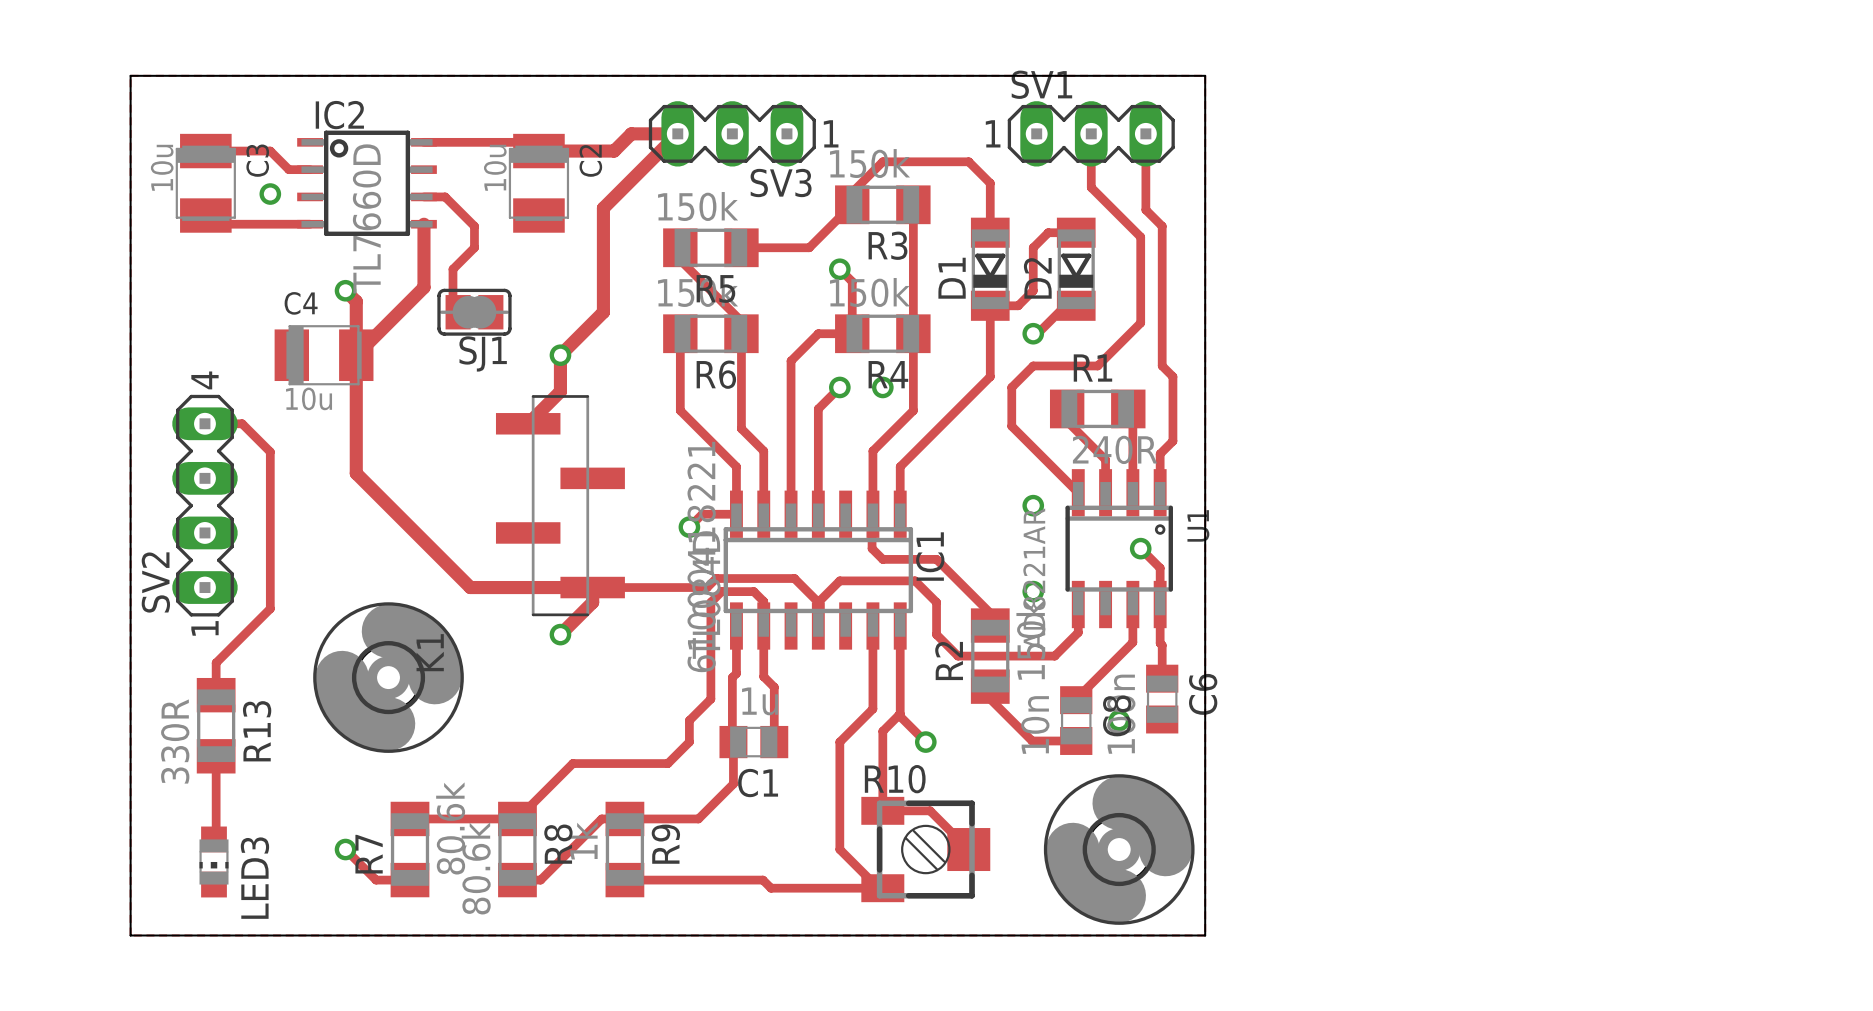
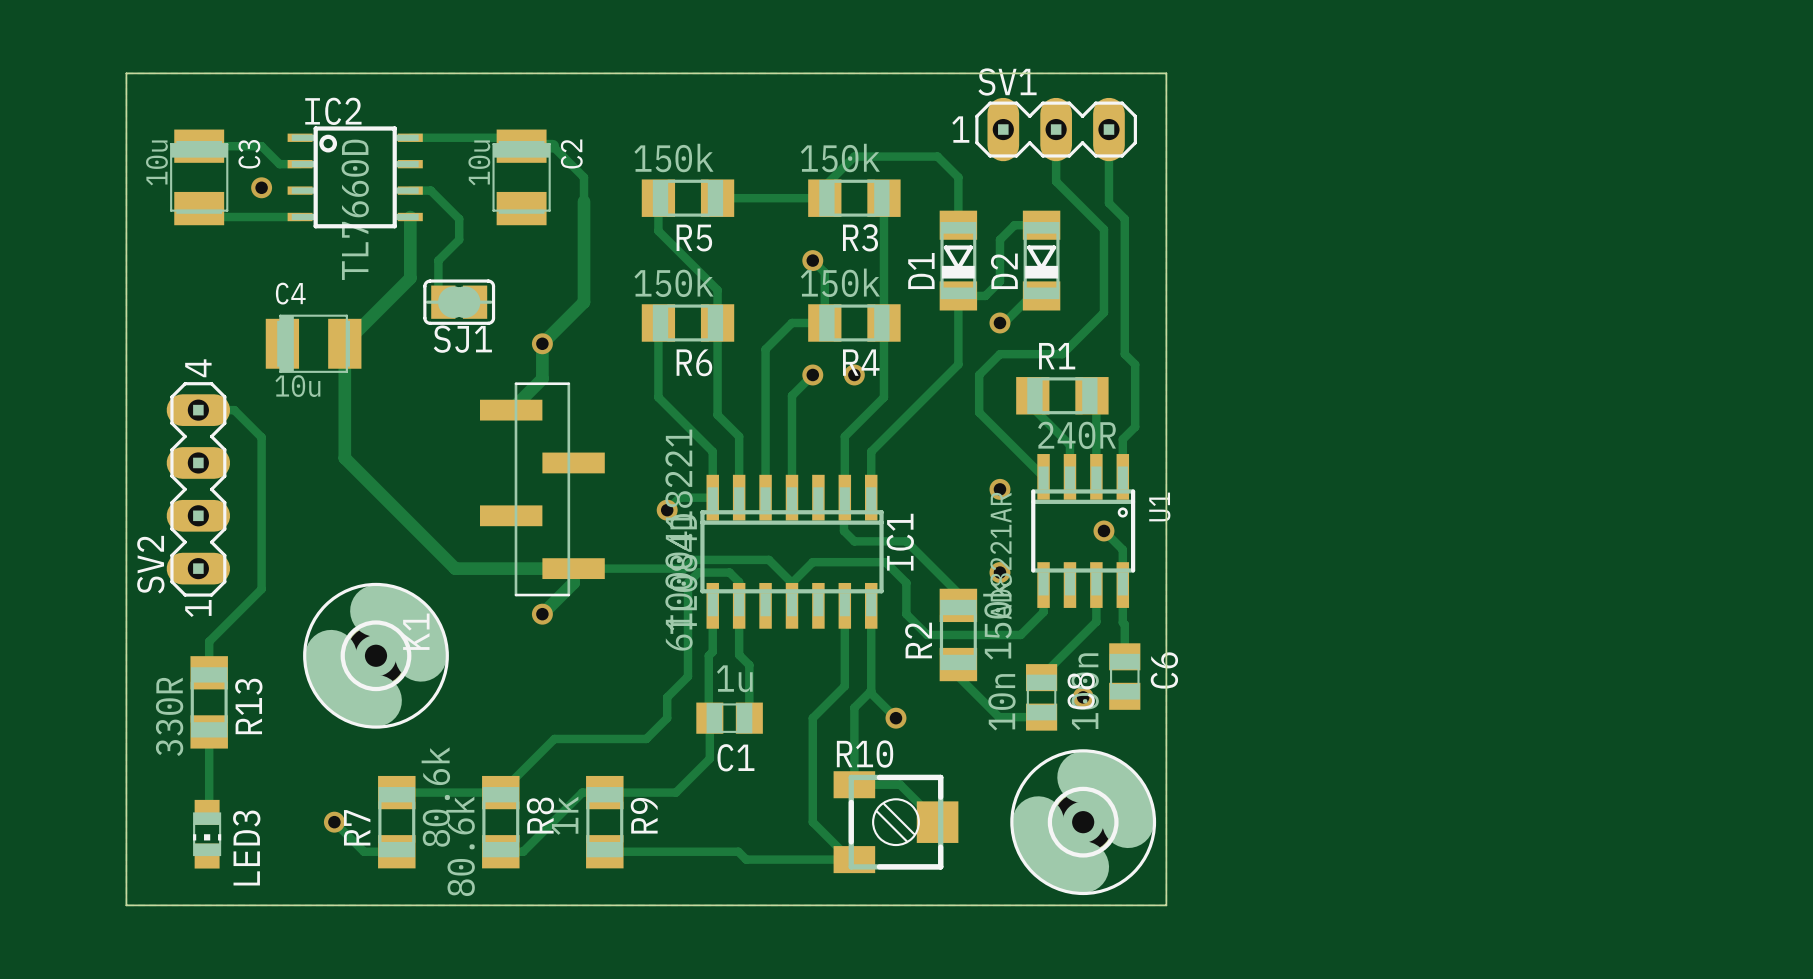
SV3: (732, 133) -> none
track: (571, 151) (614, 151) (631, 133) (677, 133) (603, 208) -> (552, 146) (583, 177) (583, 201)
track: (852, 204) (809, 247) (741, 247) -> (824, 198) (717, 198)
track: (680, 247) (680, 260) (741, 321) -> (658, 198) (658, 231) (717, 290) (717, 310)
R5 position: (710, 247) -> (687, 198)
track: (345, 290) (356, 301) (356, 355) -> none
via: (345, 290) -> none

